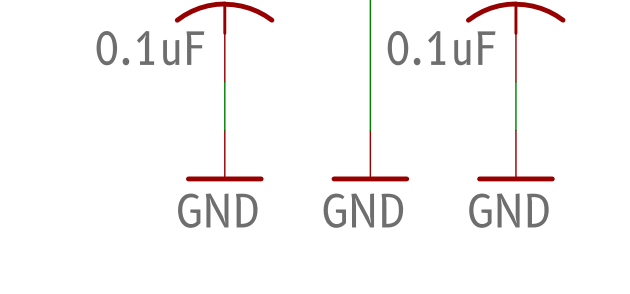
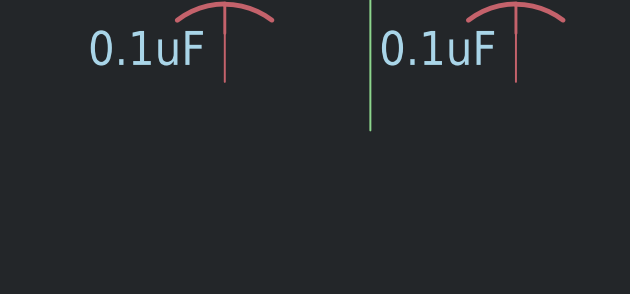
wire: (224, 81) (224, 130) -> none
wire: (515, 81) (515, 130) -> none
power symbol: GND (224, 155) -> none
power symbol: GND (370, 155) -> none
power symbol: GND (515, 155) -> none

